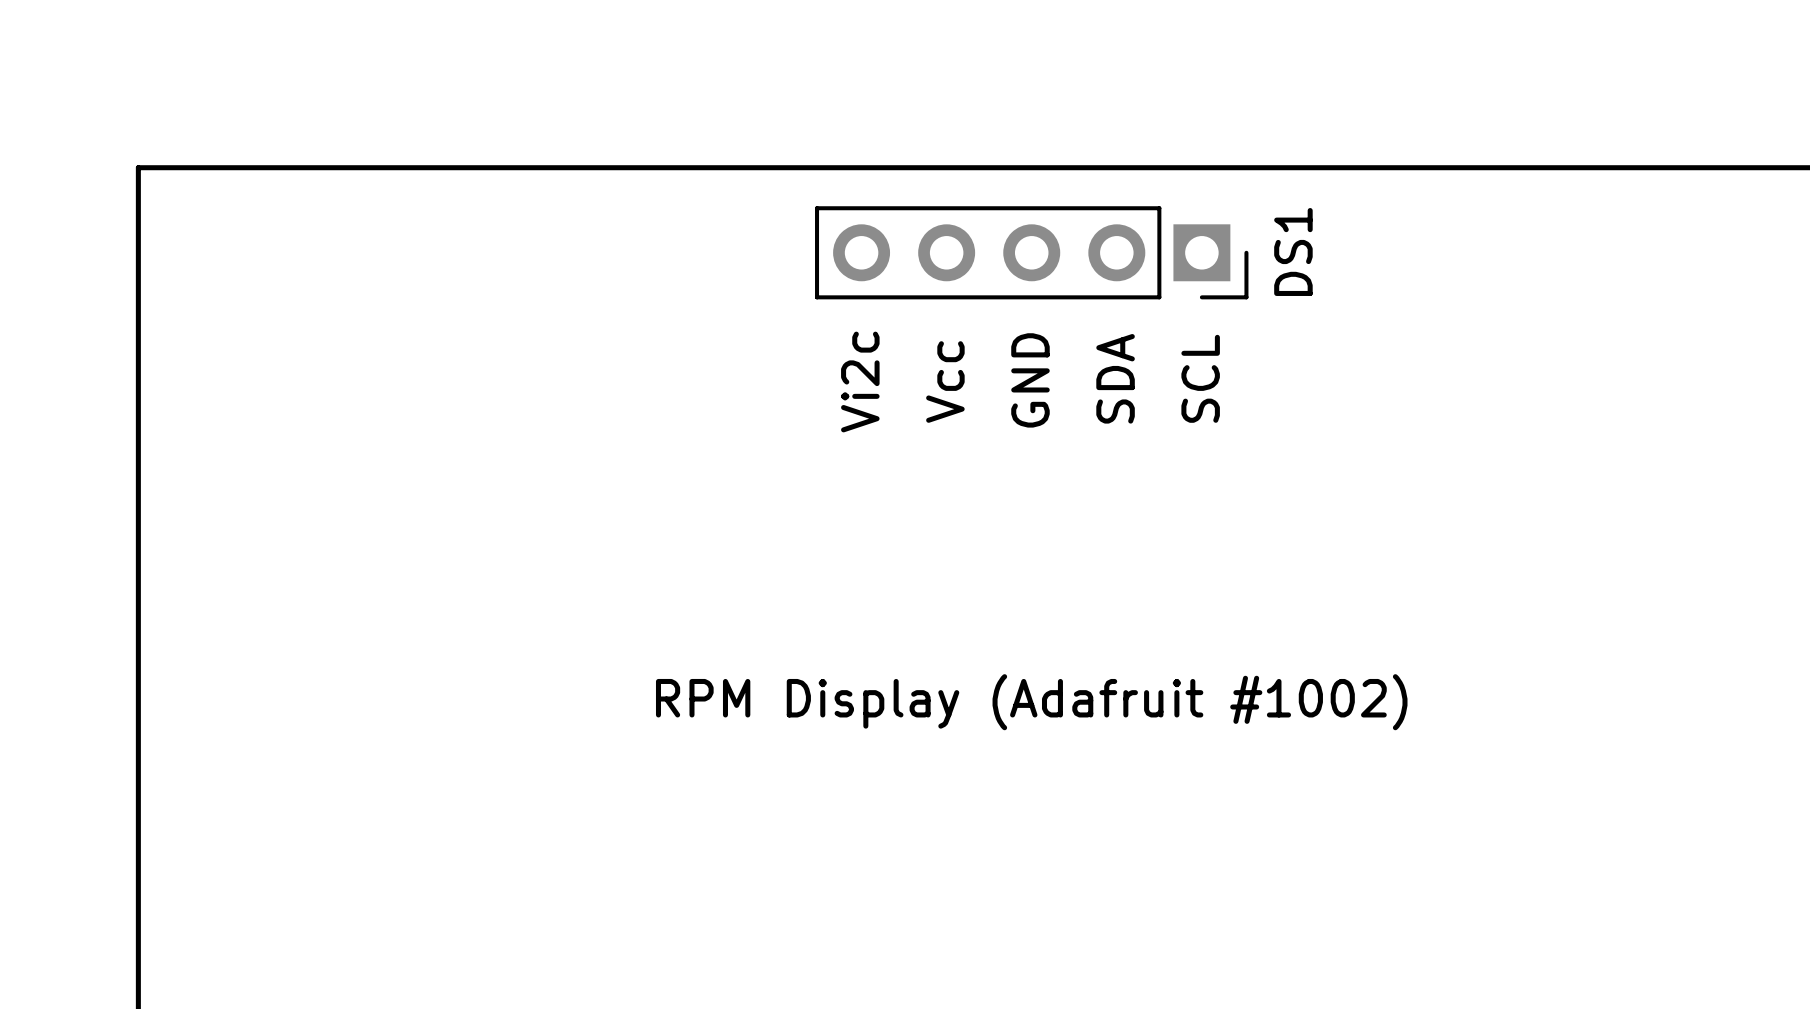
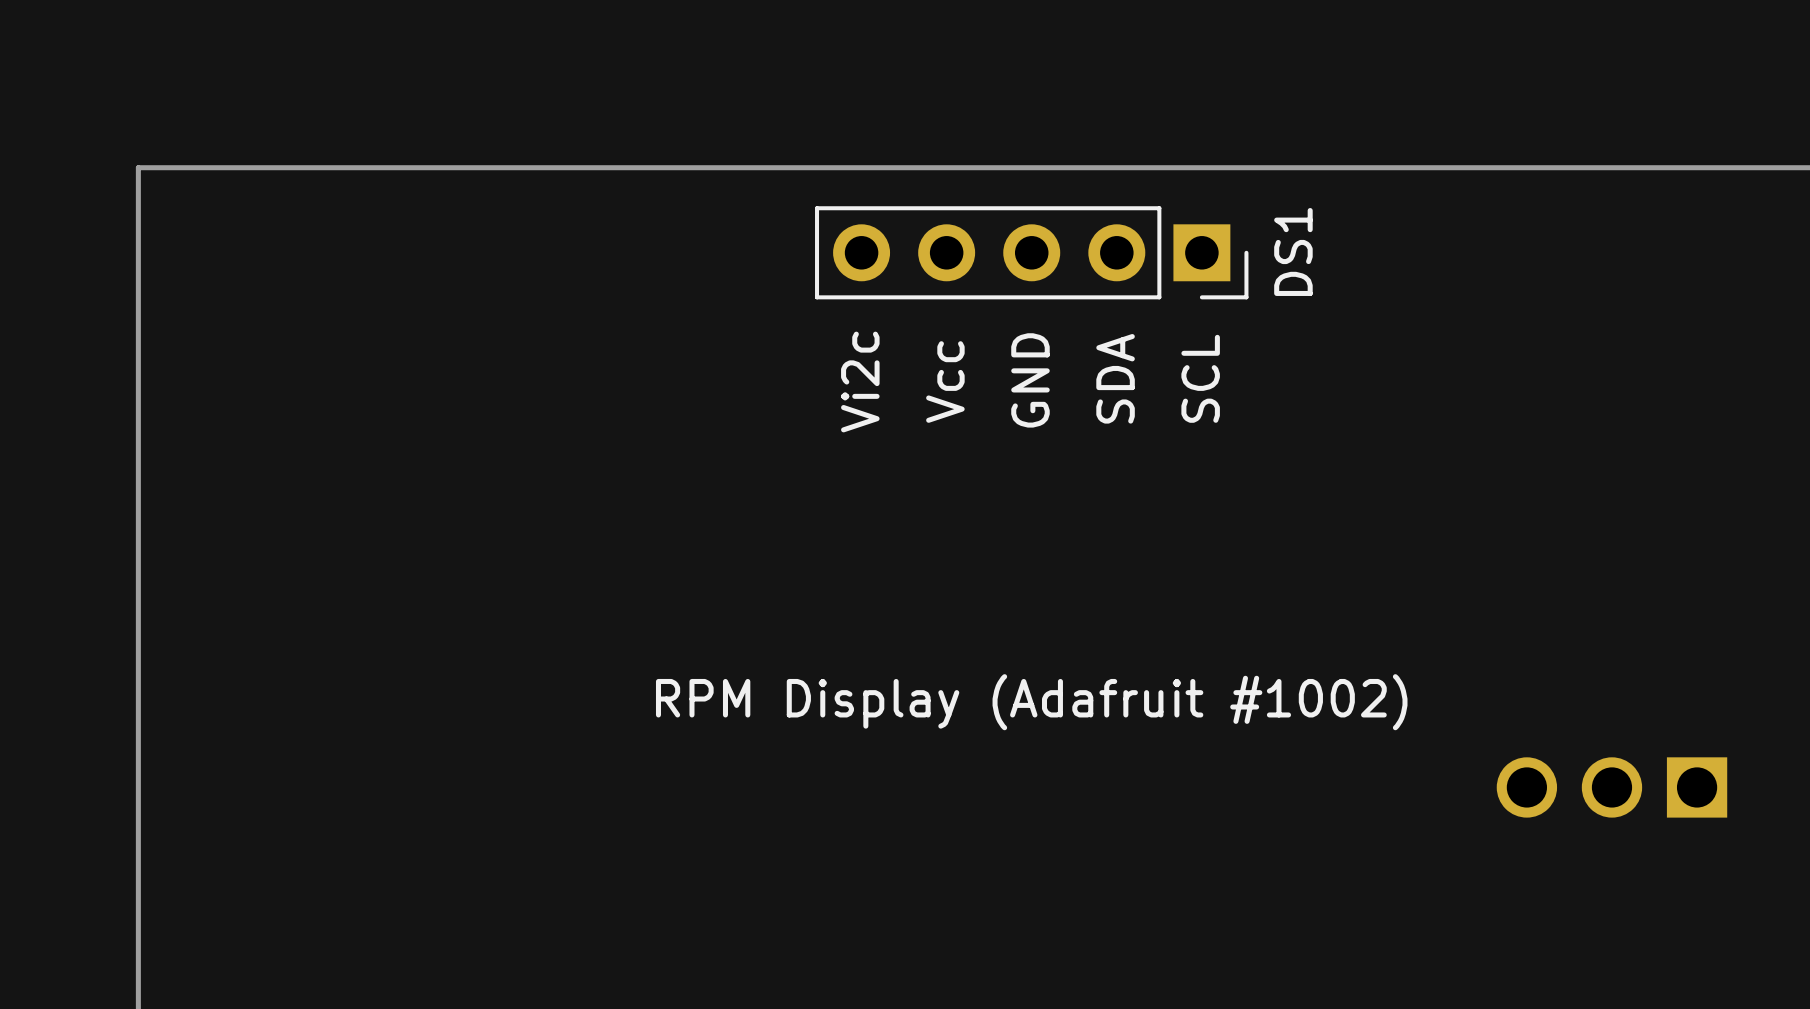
part: none -> (1611, 787)

